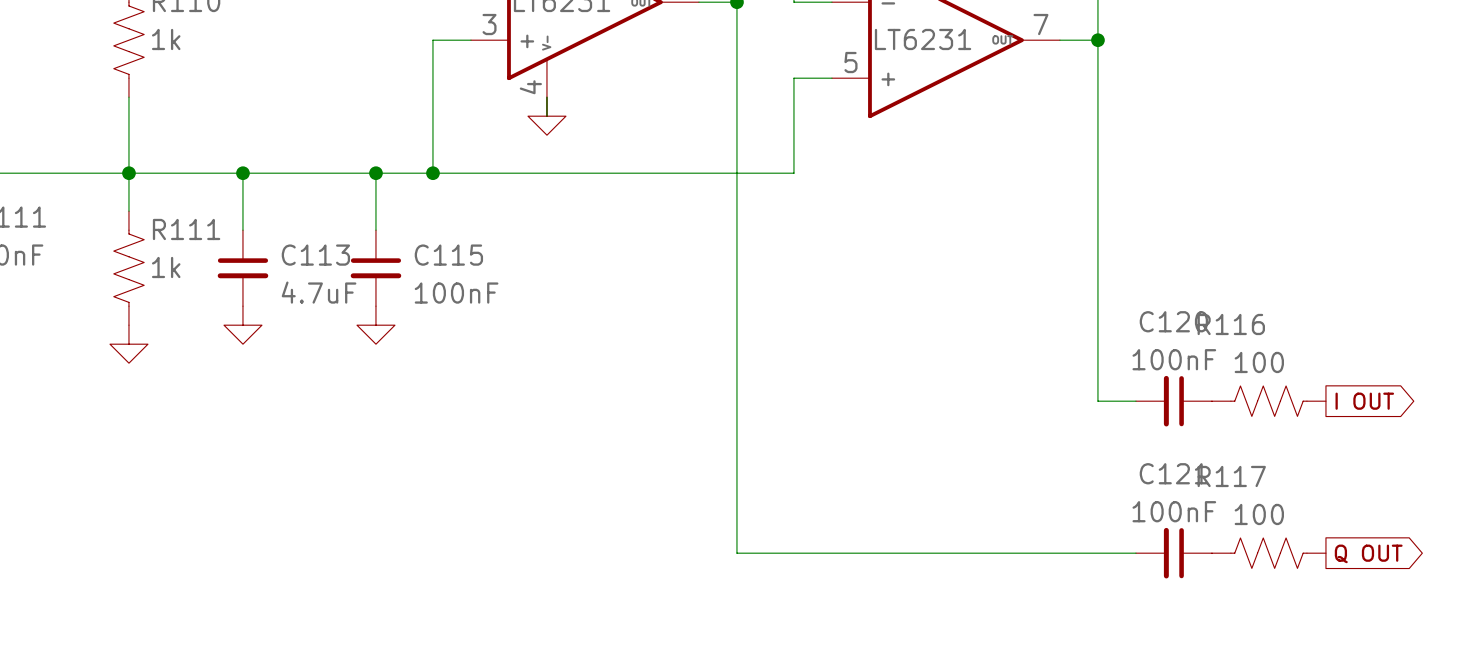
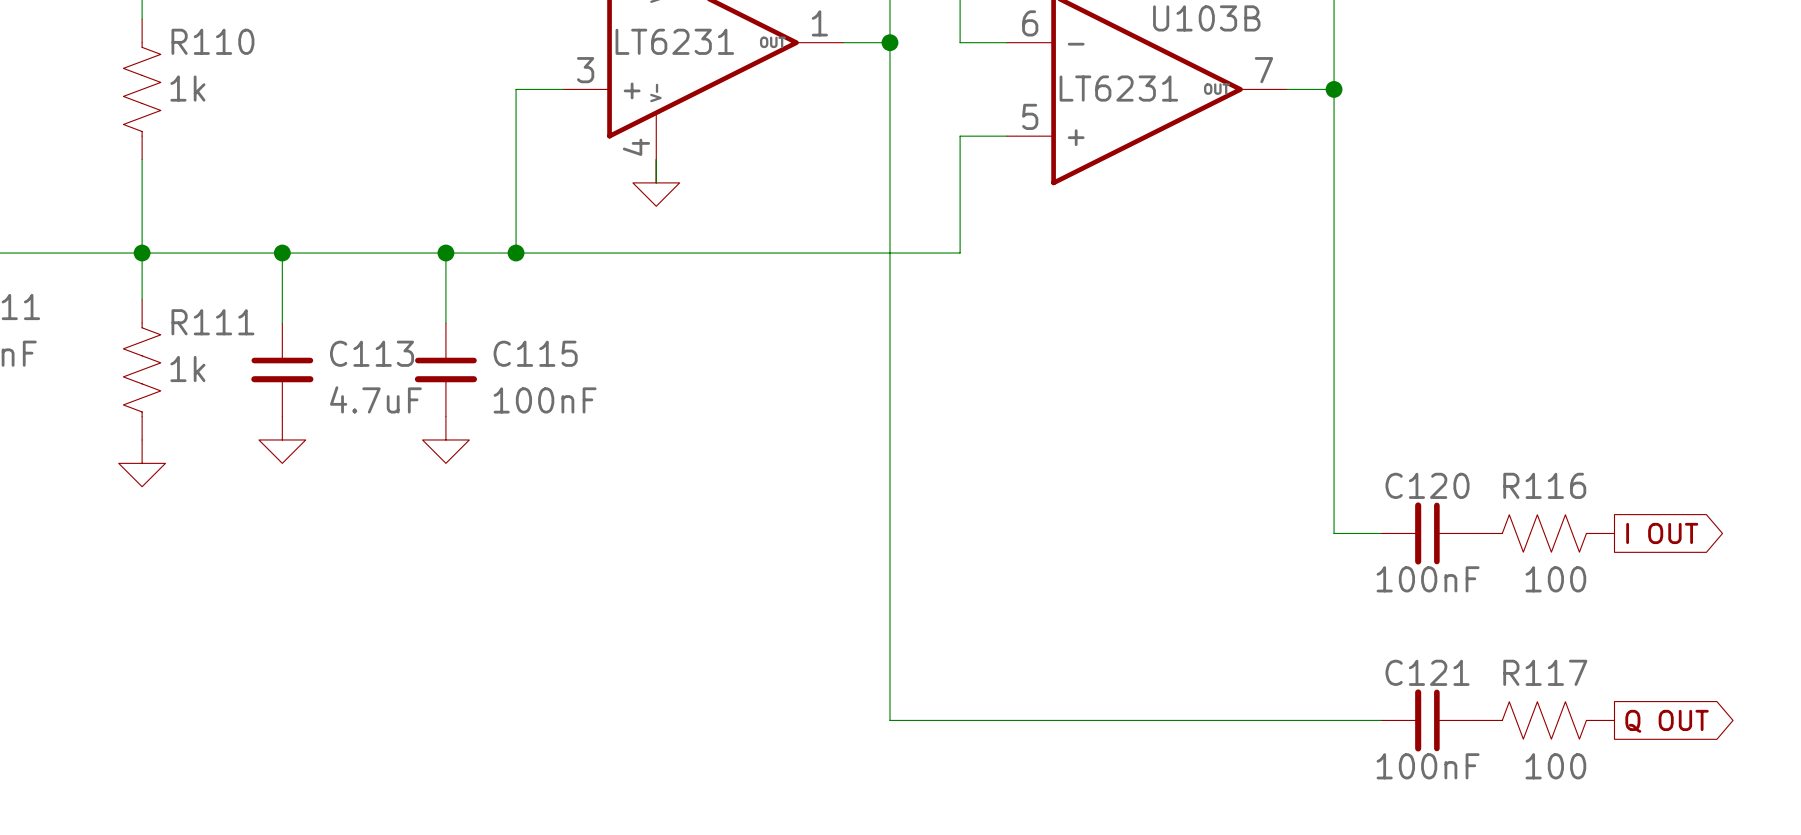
C120 name position: C120 (1173, 321) -> C120 (1427, 485)
R116 name position: R116 (1231, 324) -> R116 (1544, 485)
C120 value position: 100nF (1174, 359) -> 100nF (1428, 579)
R116 value position: 100 (1259, 362) -> 100 (1555, 579)
C121 name position: C121 (1173, 473) -> C121 (1427, 672)
R117 name position: R117 (1231, 476) -> R117 (1545, 672)
C121 value position: 100nF (1174, 511) -> 100nF (1428, 766)
R117 value position: 100 (1259, 514) -> 100 (1555, 766)

